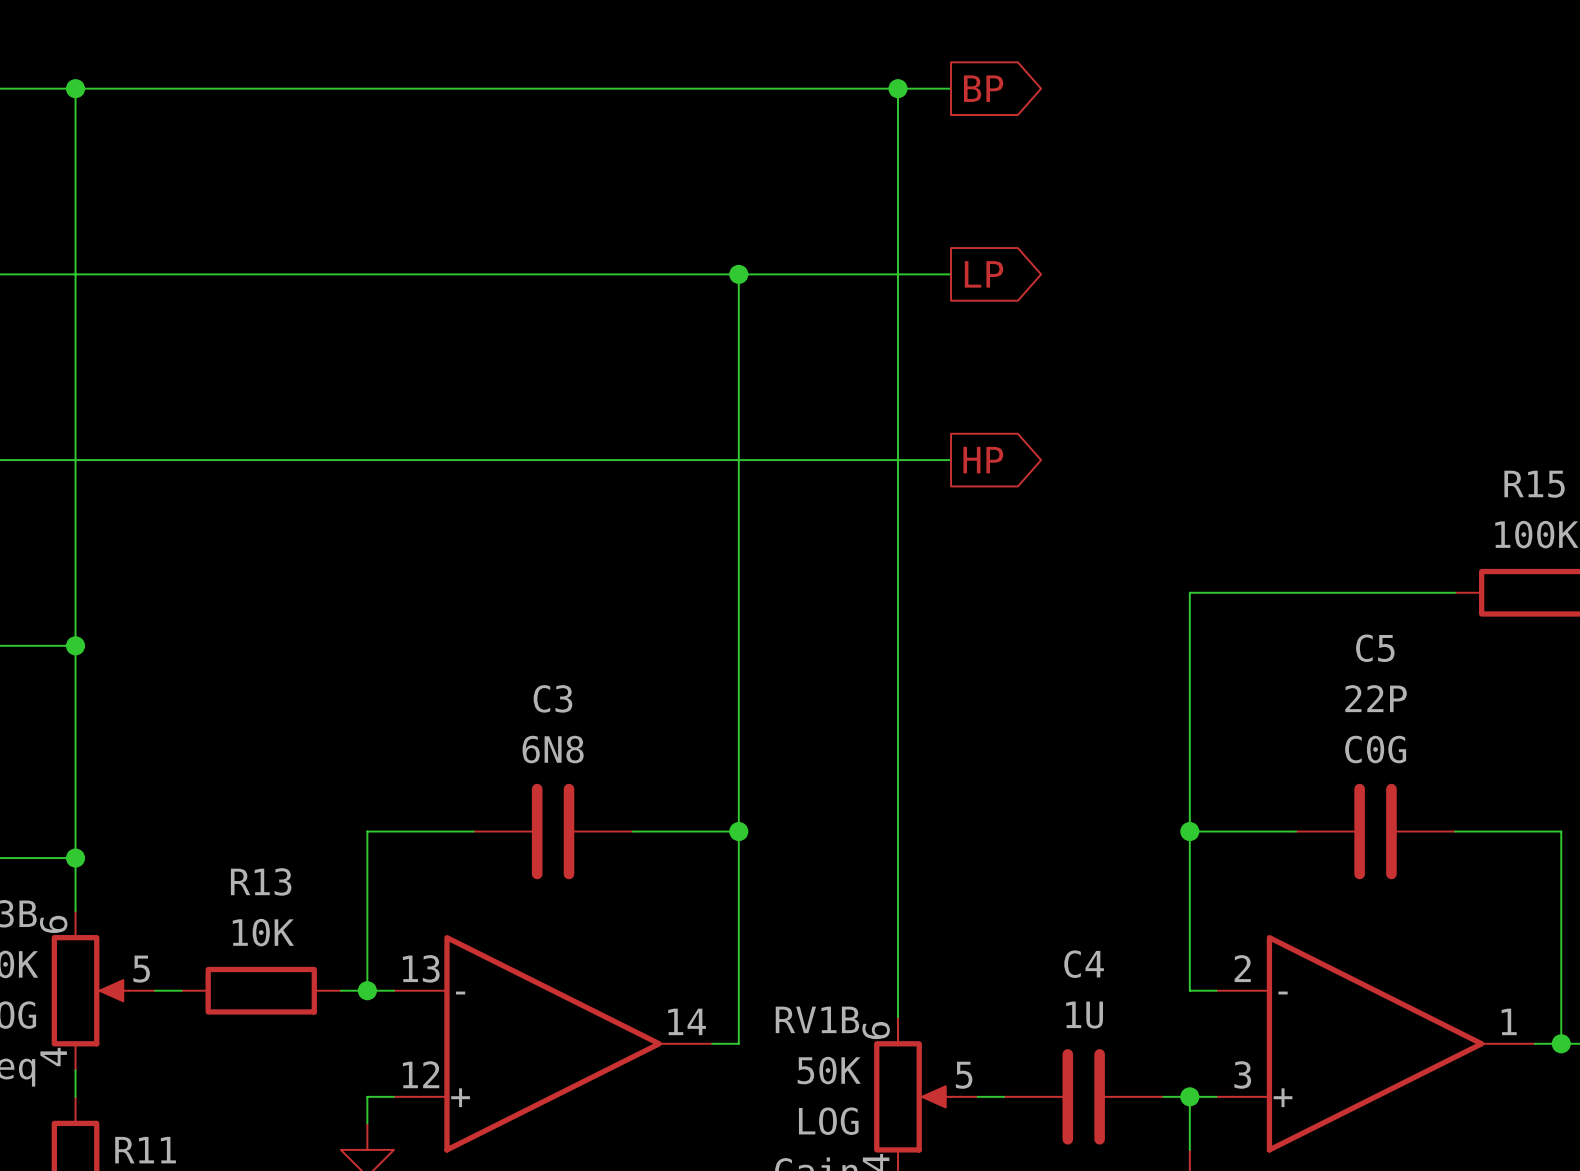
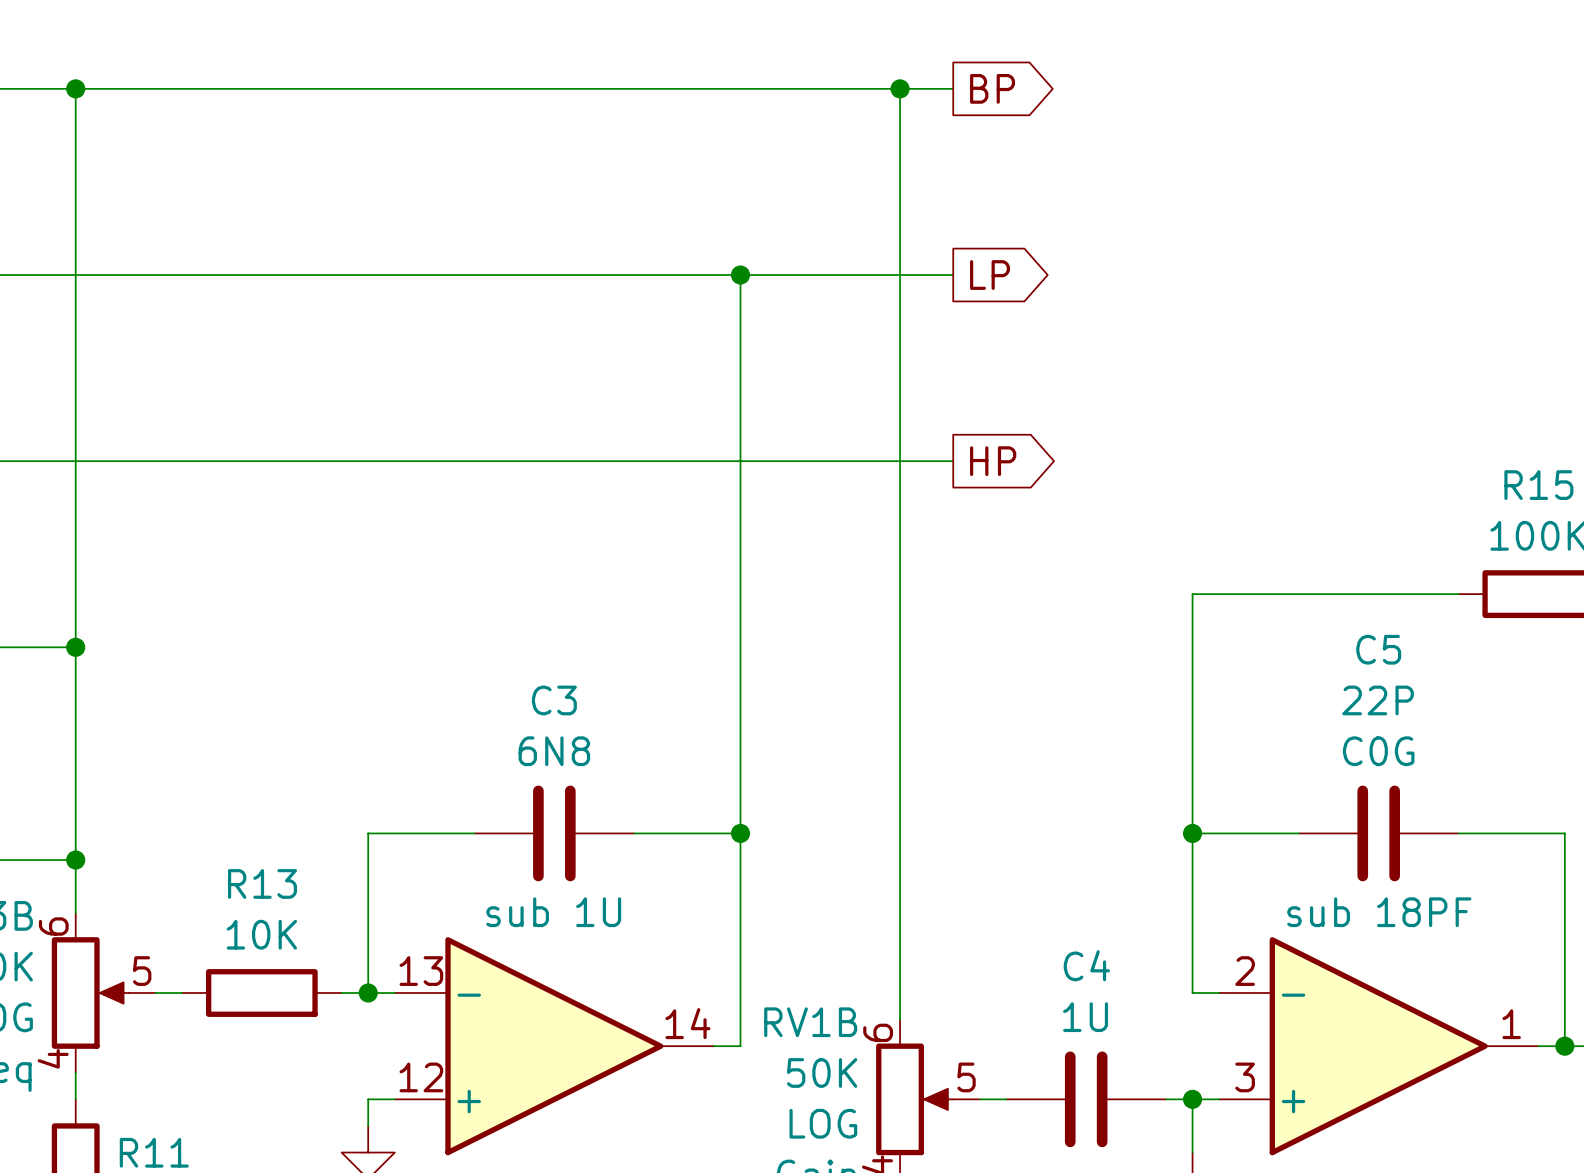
C3 text: none -> sub 1U (553, 912)
C5 text: none -> sub 18PF (1379, 912)

